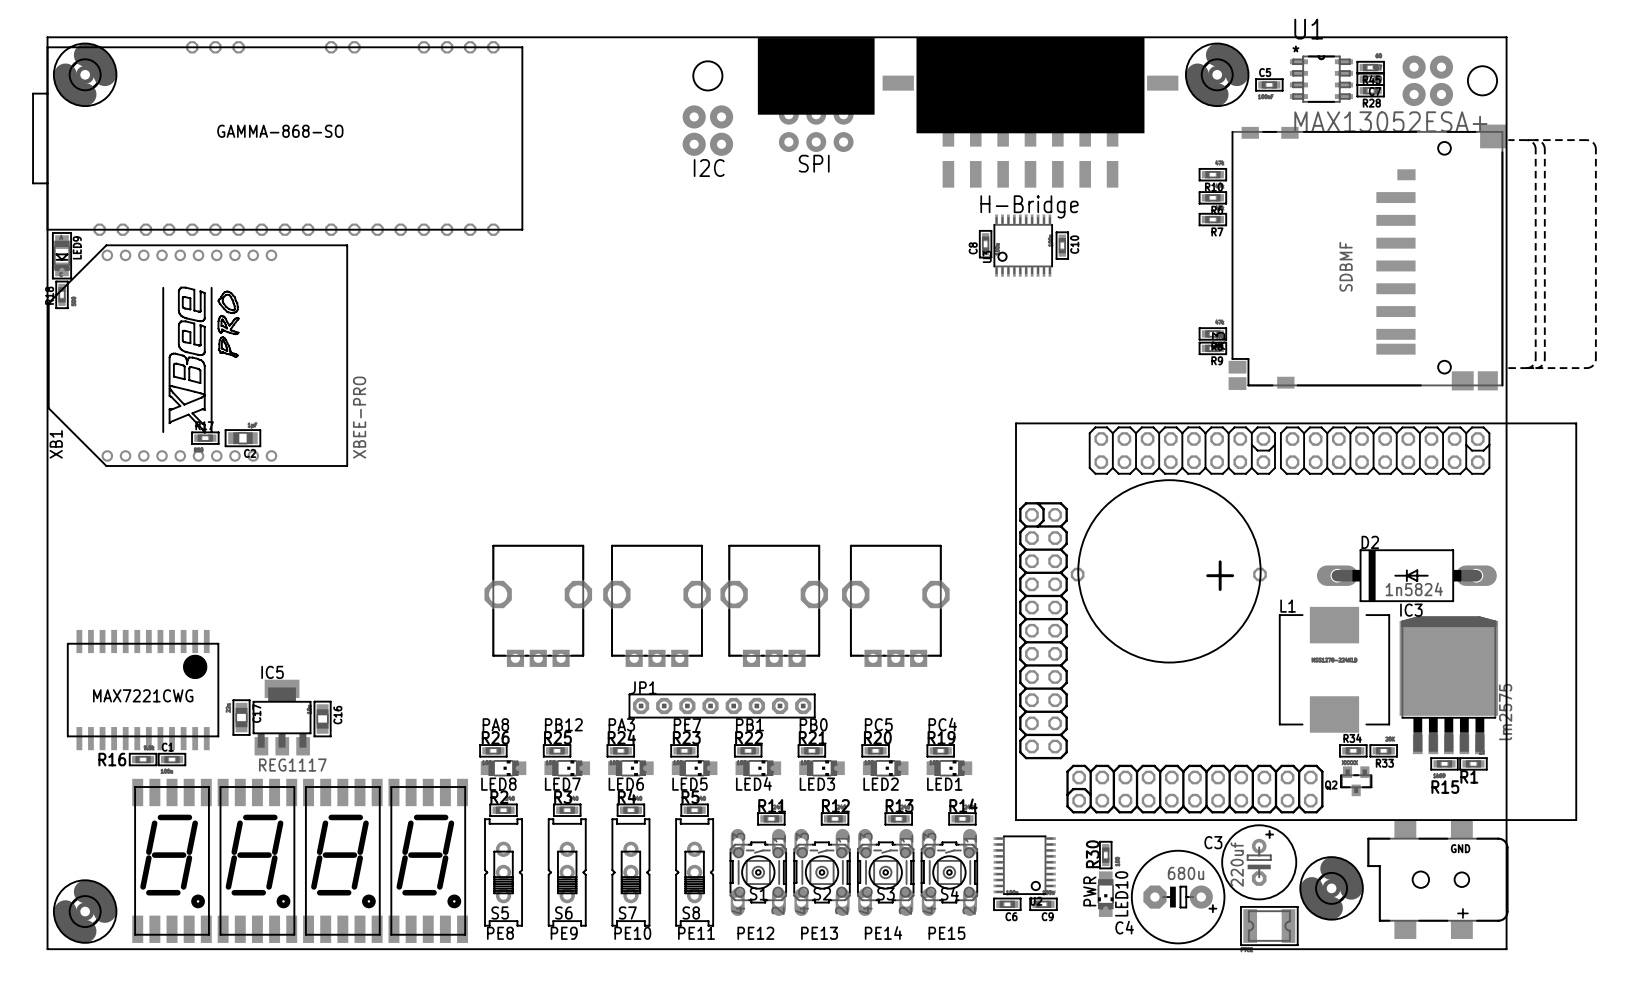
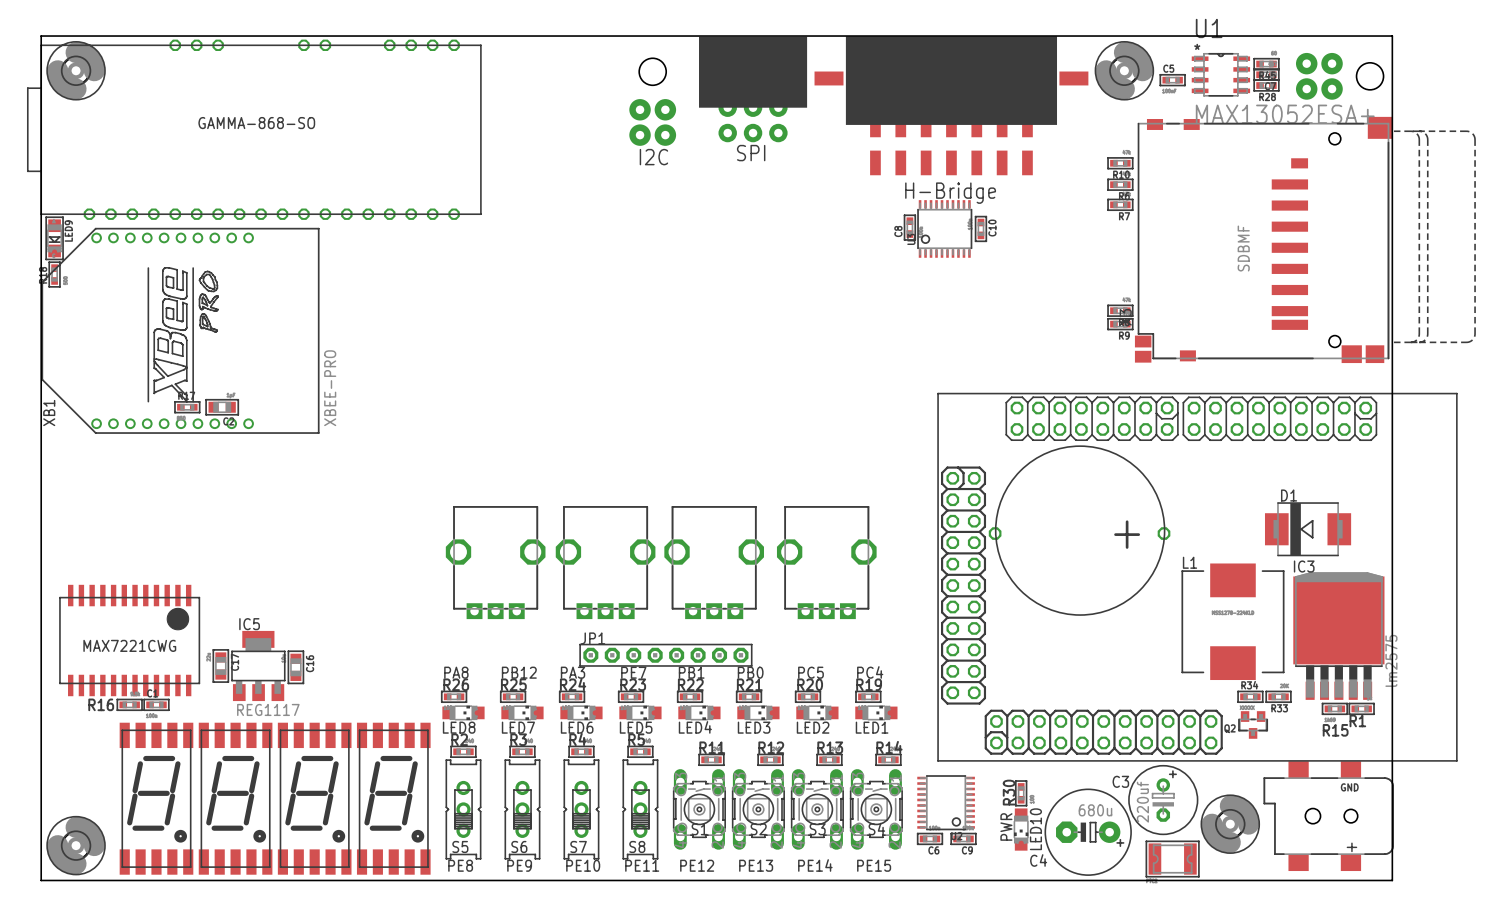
D1: none -> (1308, 529)
D2: 1n5824 (1406, 575) -> none

